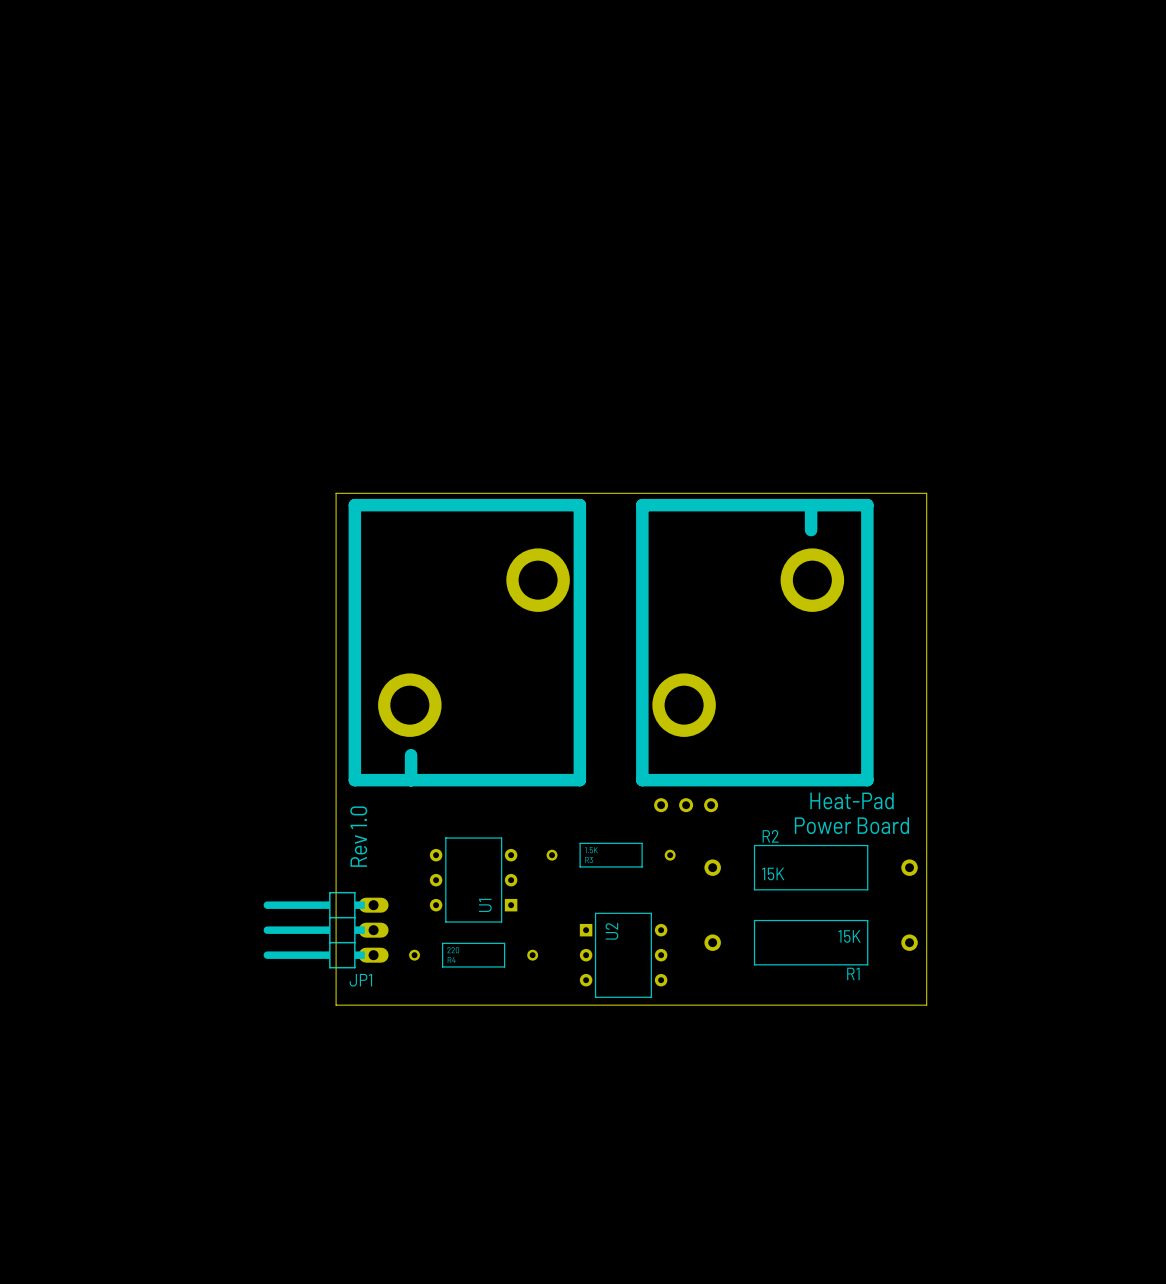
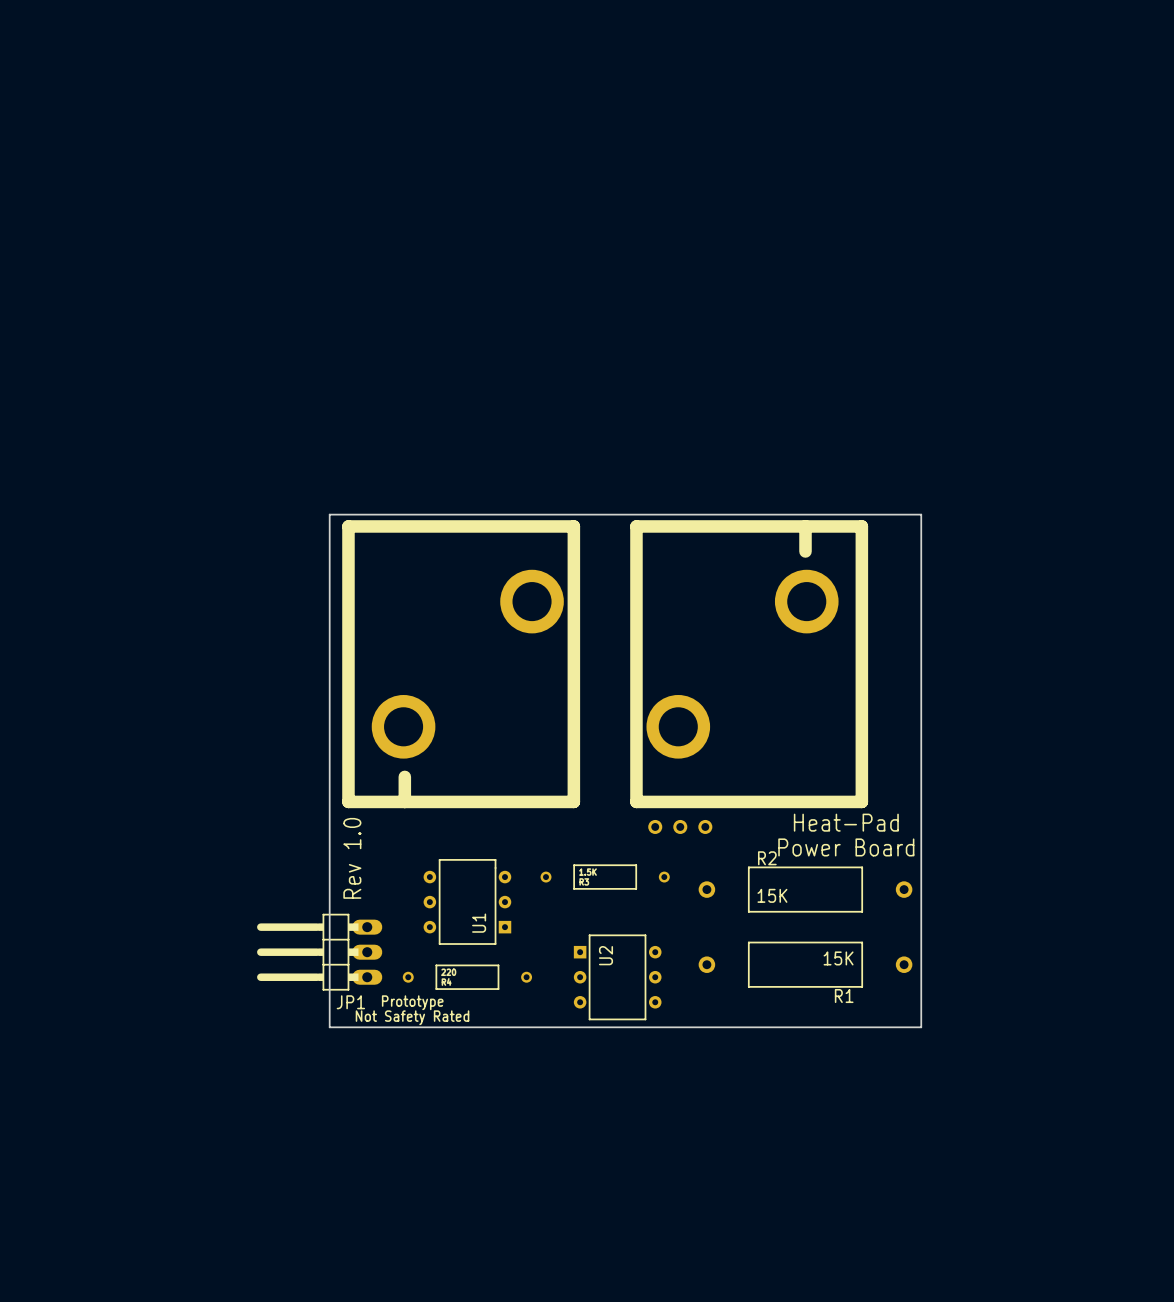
text: none -> Prototype (412, 1002)
text: none -> Not Safety Rated (412, 1017)

